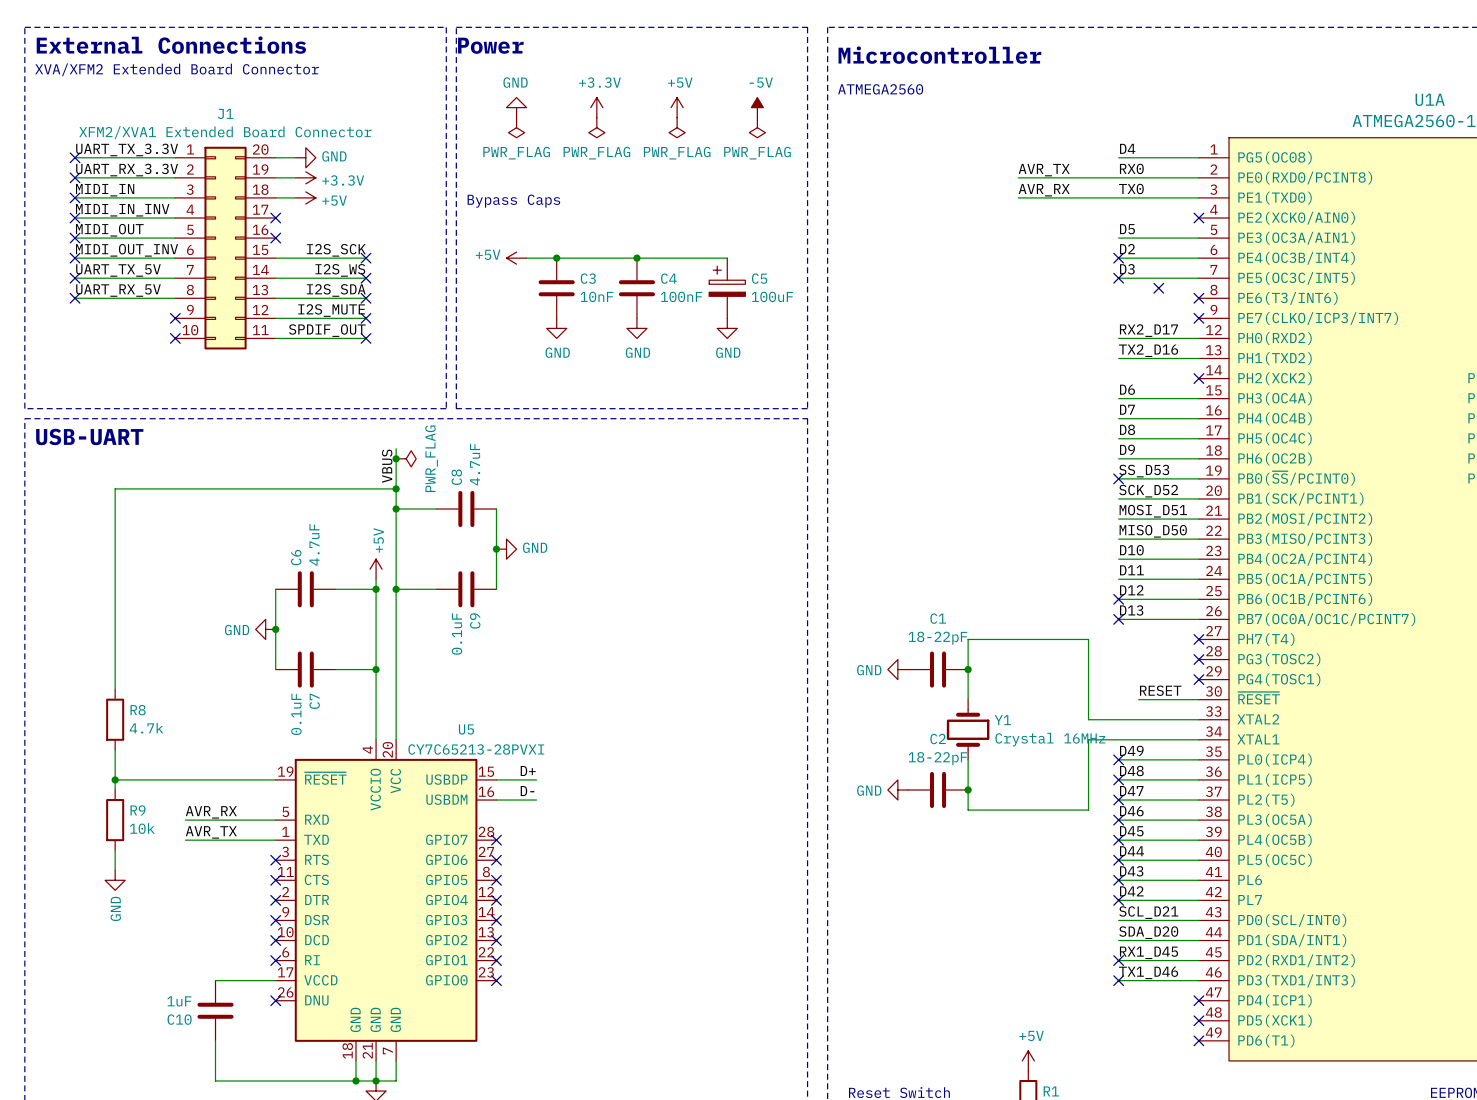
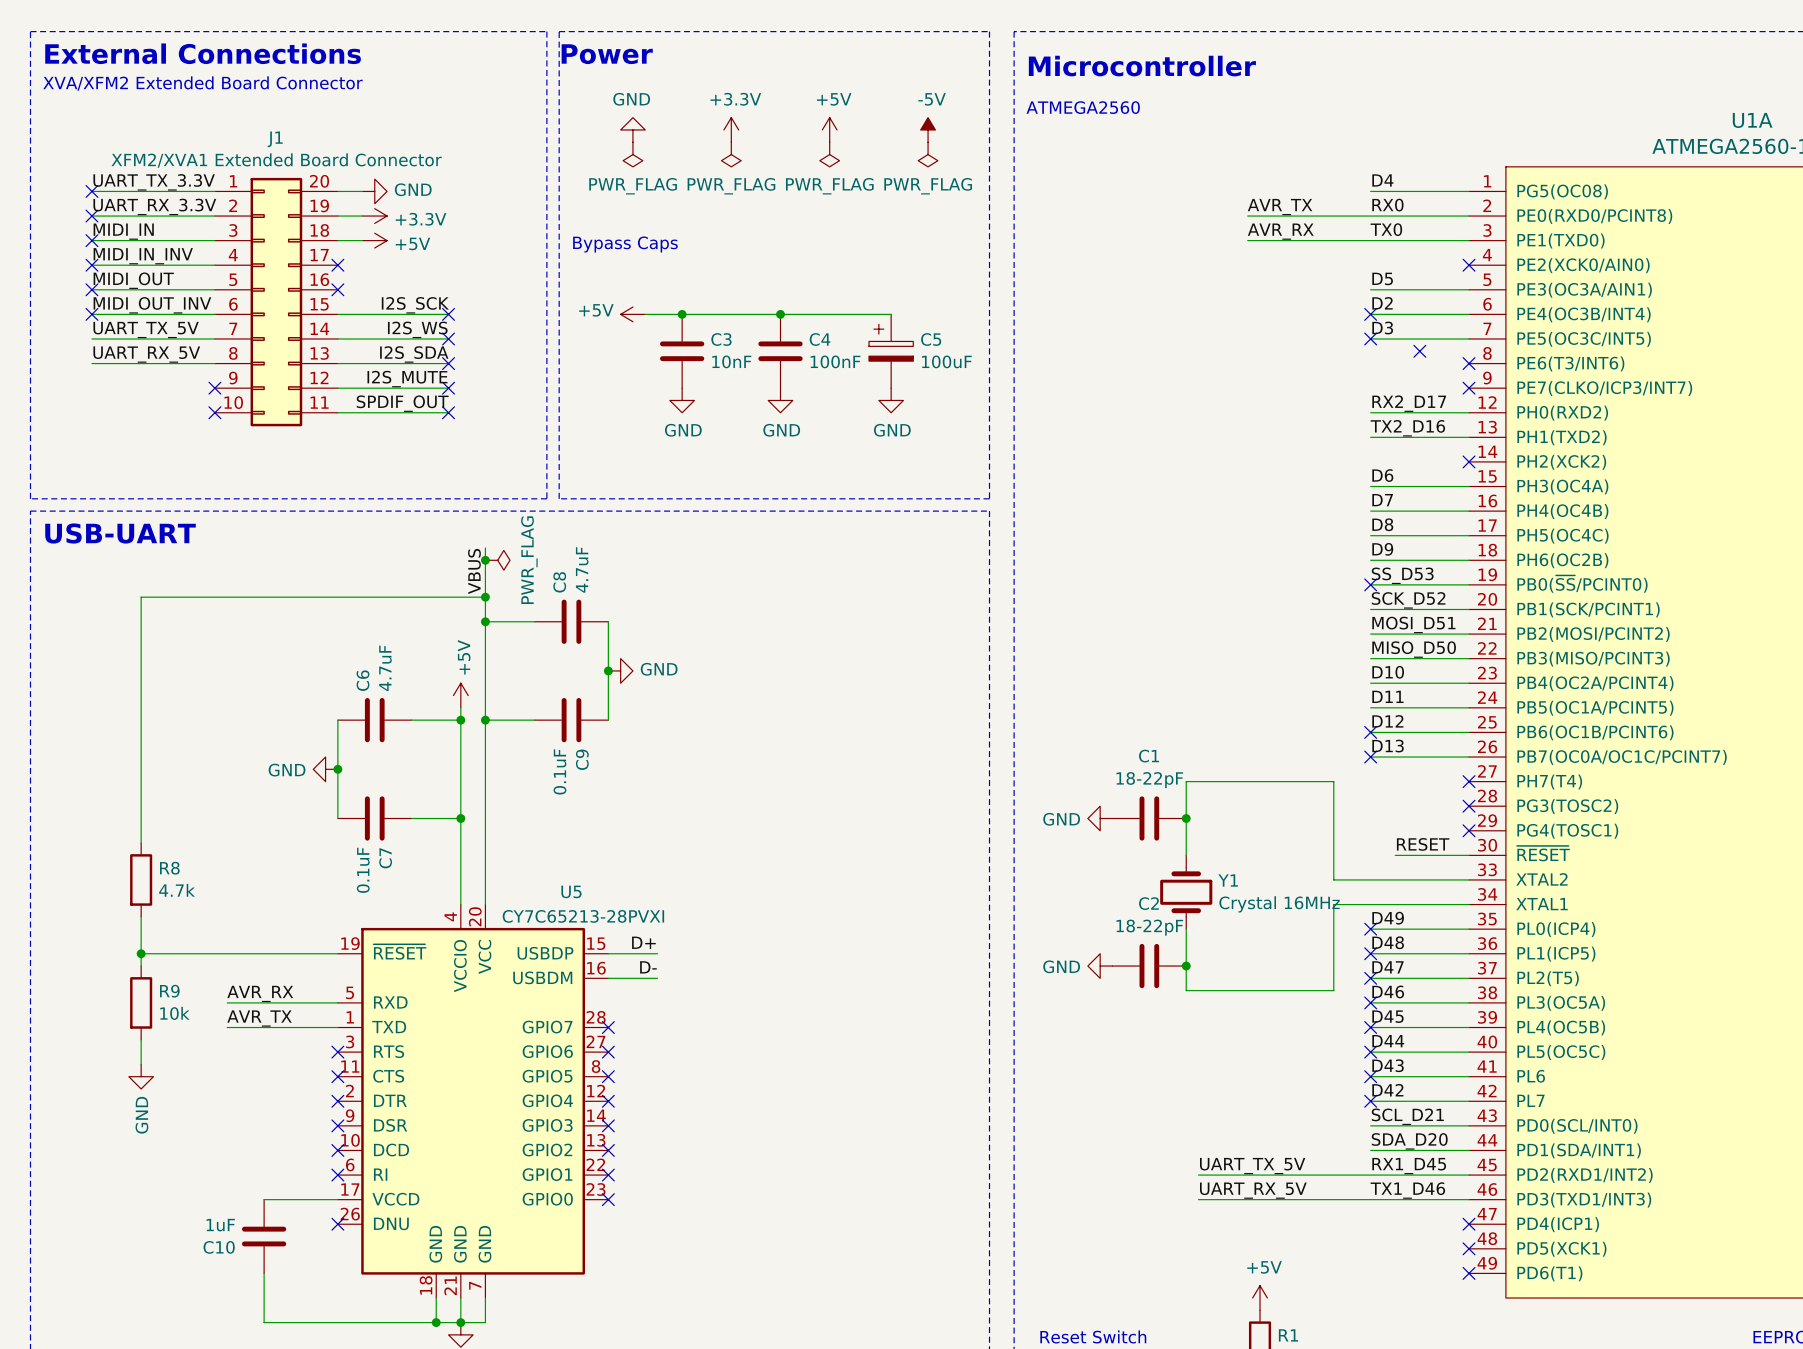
no-connect mark: (75, 278) -> none
no-connect mark: (75, 298) -> none
label: none -> UART_TX_5V (1252, 1166)
wire: none -> (1198, 1175) (1370, 1175)
no-connect mark: (1118, 960) -> none
label: none -> UART_RX_5V (1253, 1190)
wire: none -> (1198, 1199) (1370, 1199)
no-connect mark: (1118, 980) -> none

